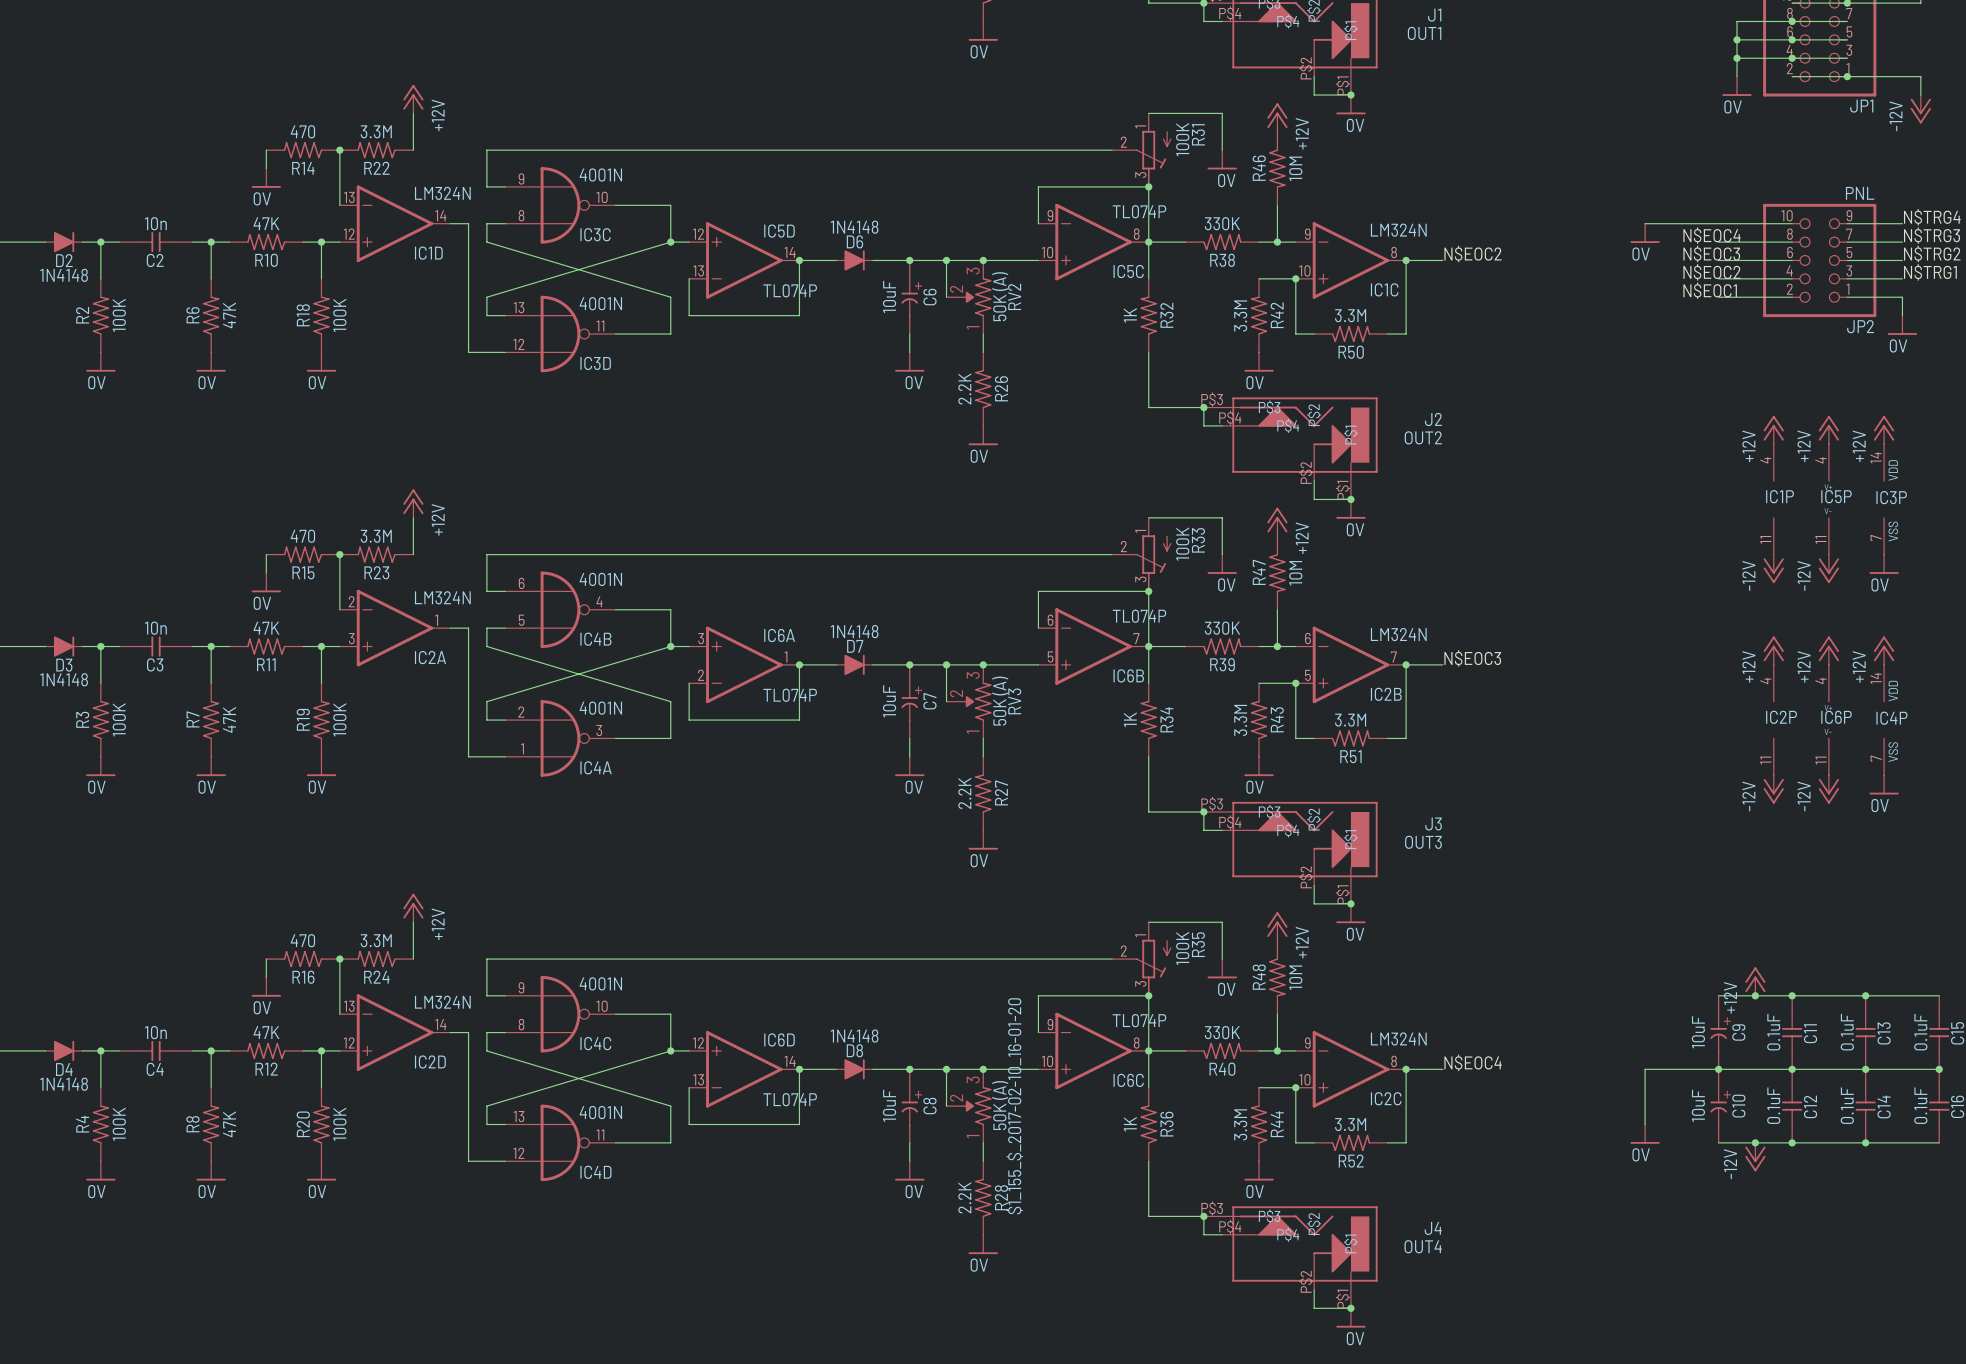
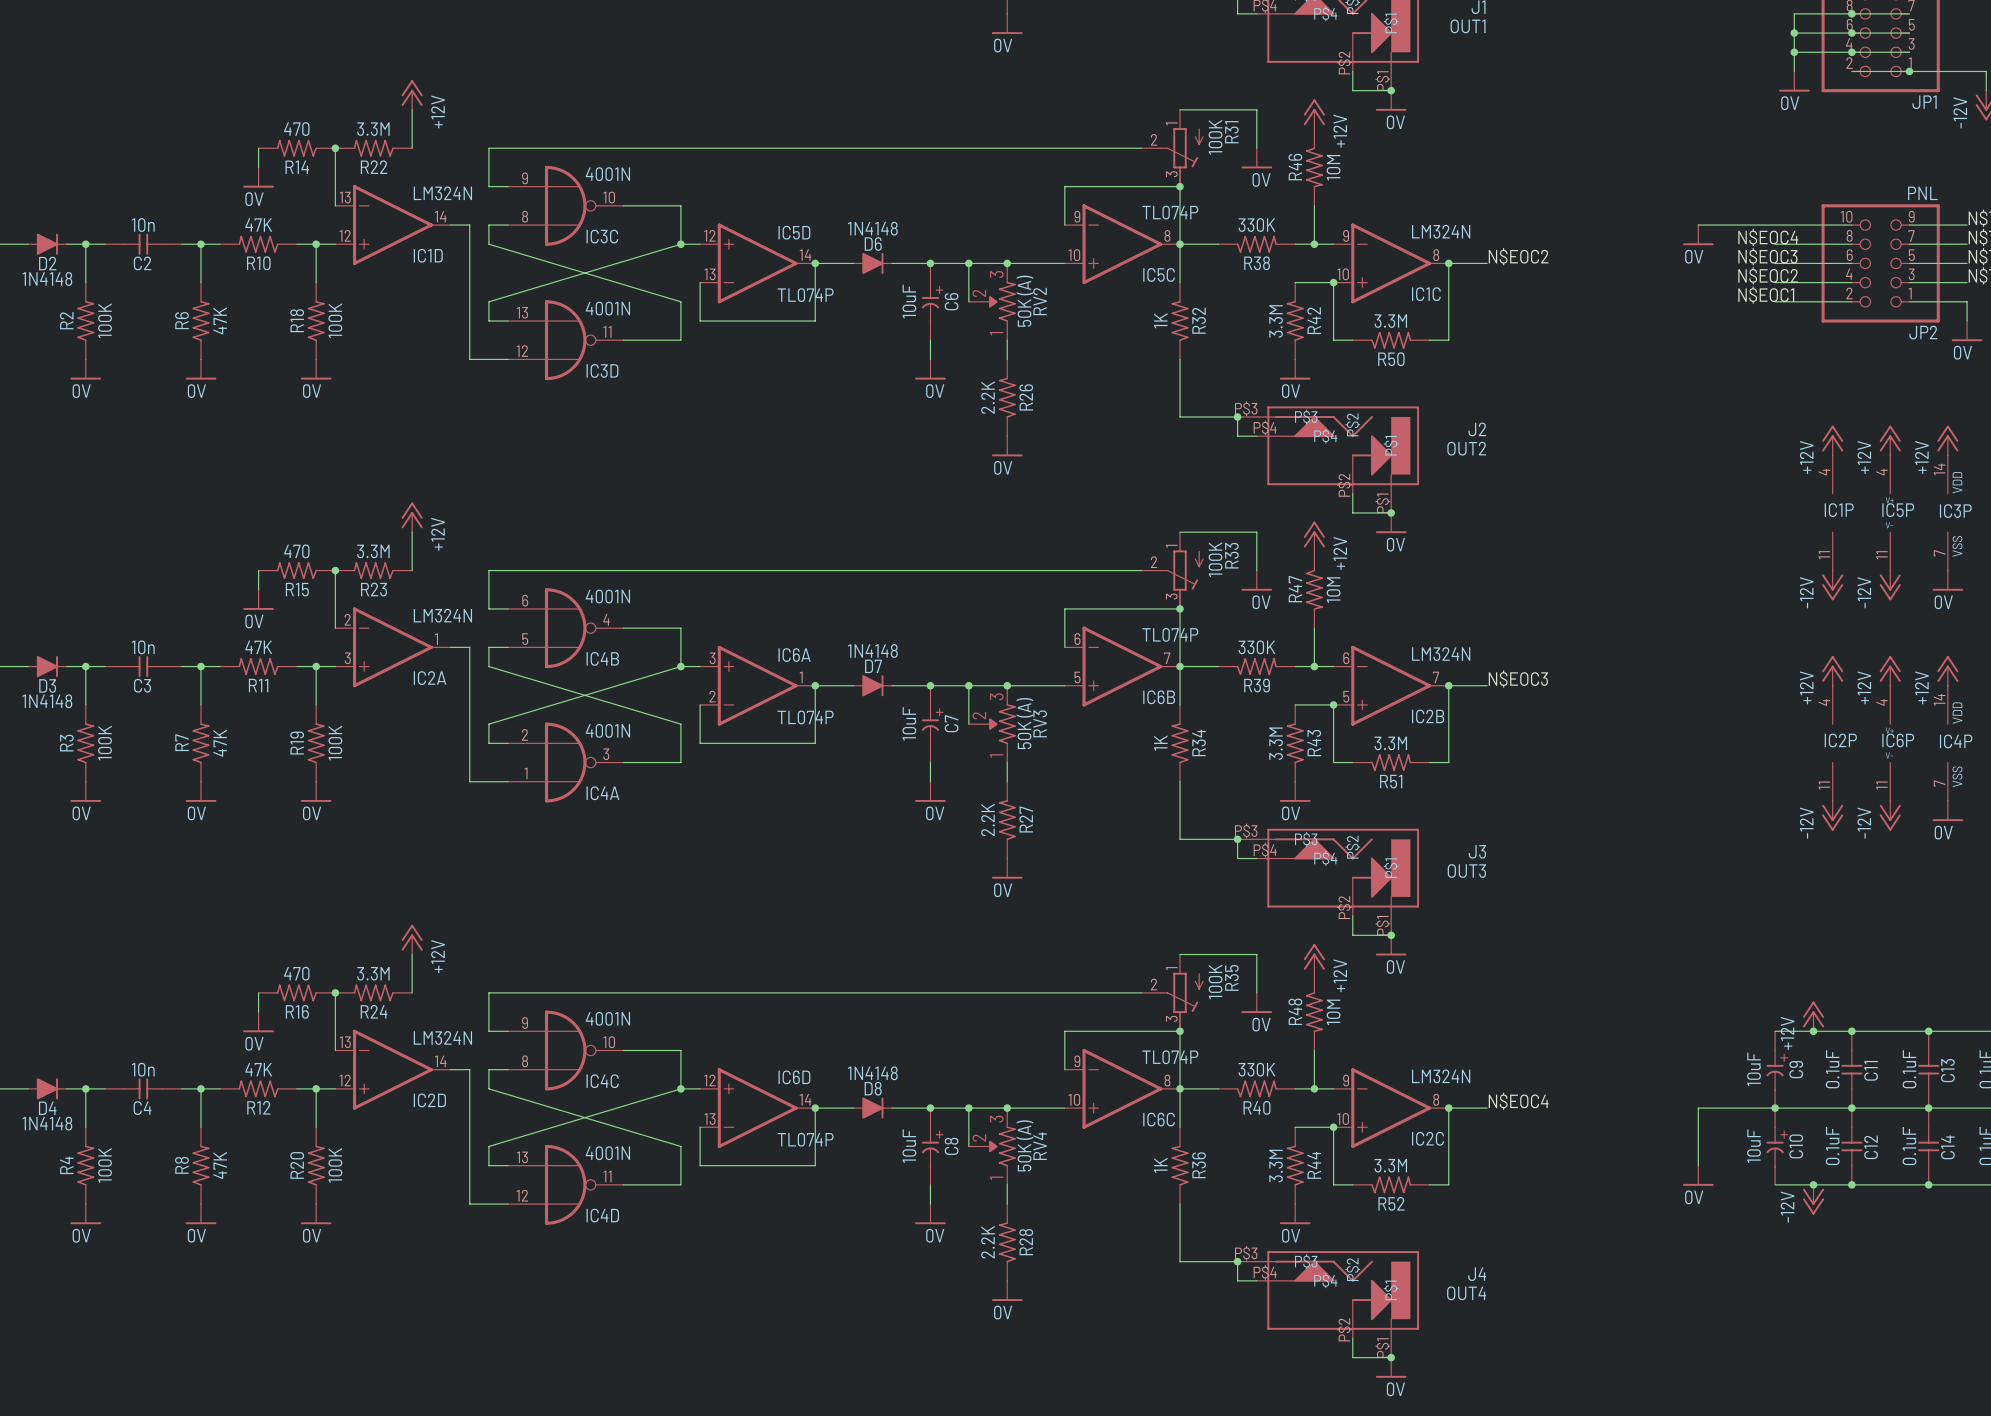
$1_155_$_2017-02-10_16-01-20 name: $1_155_$_2017-02-10_16-01-20 (1014, 1106) -> RV4 (1040, 1146)

